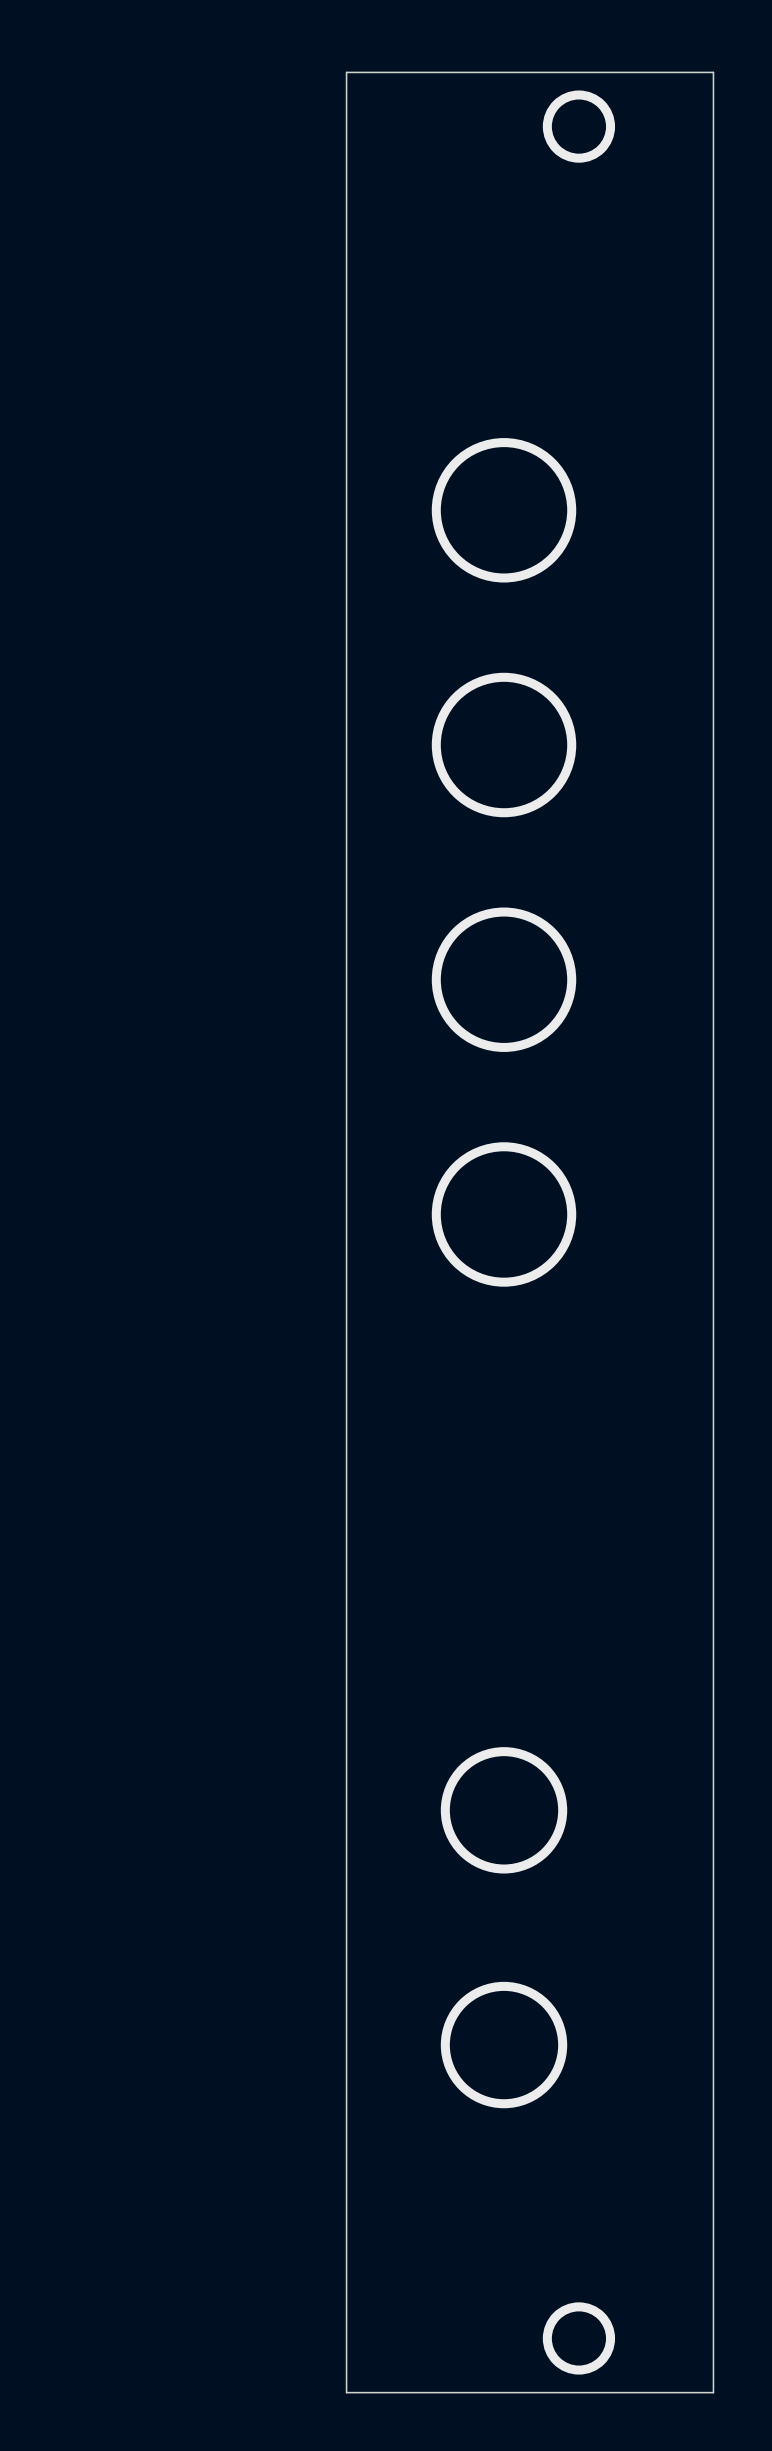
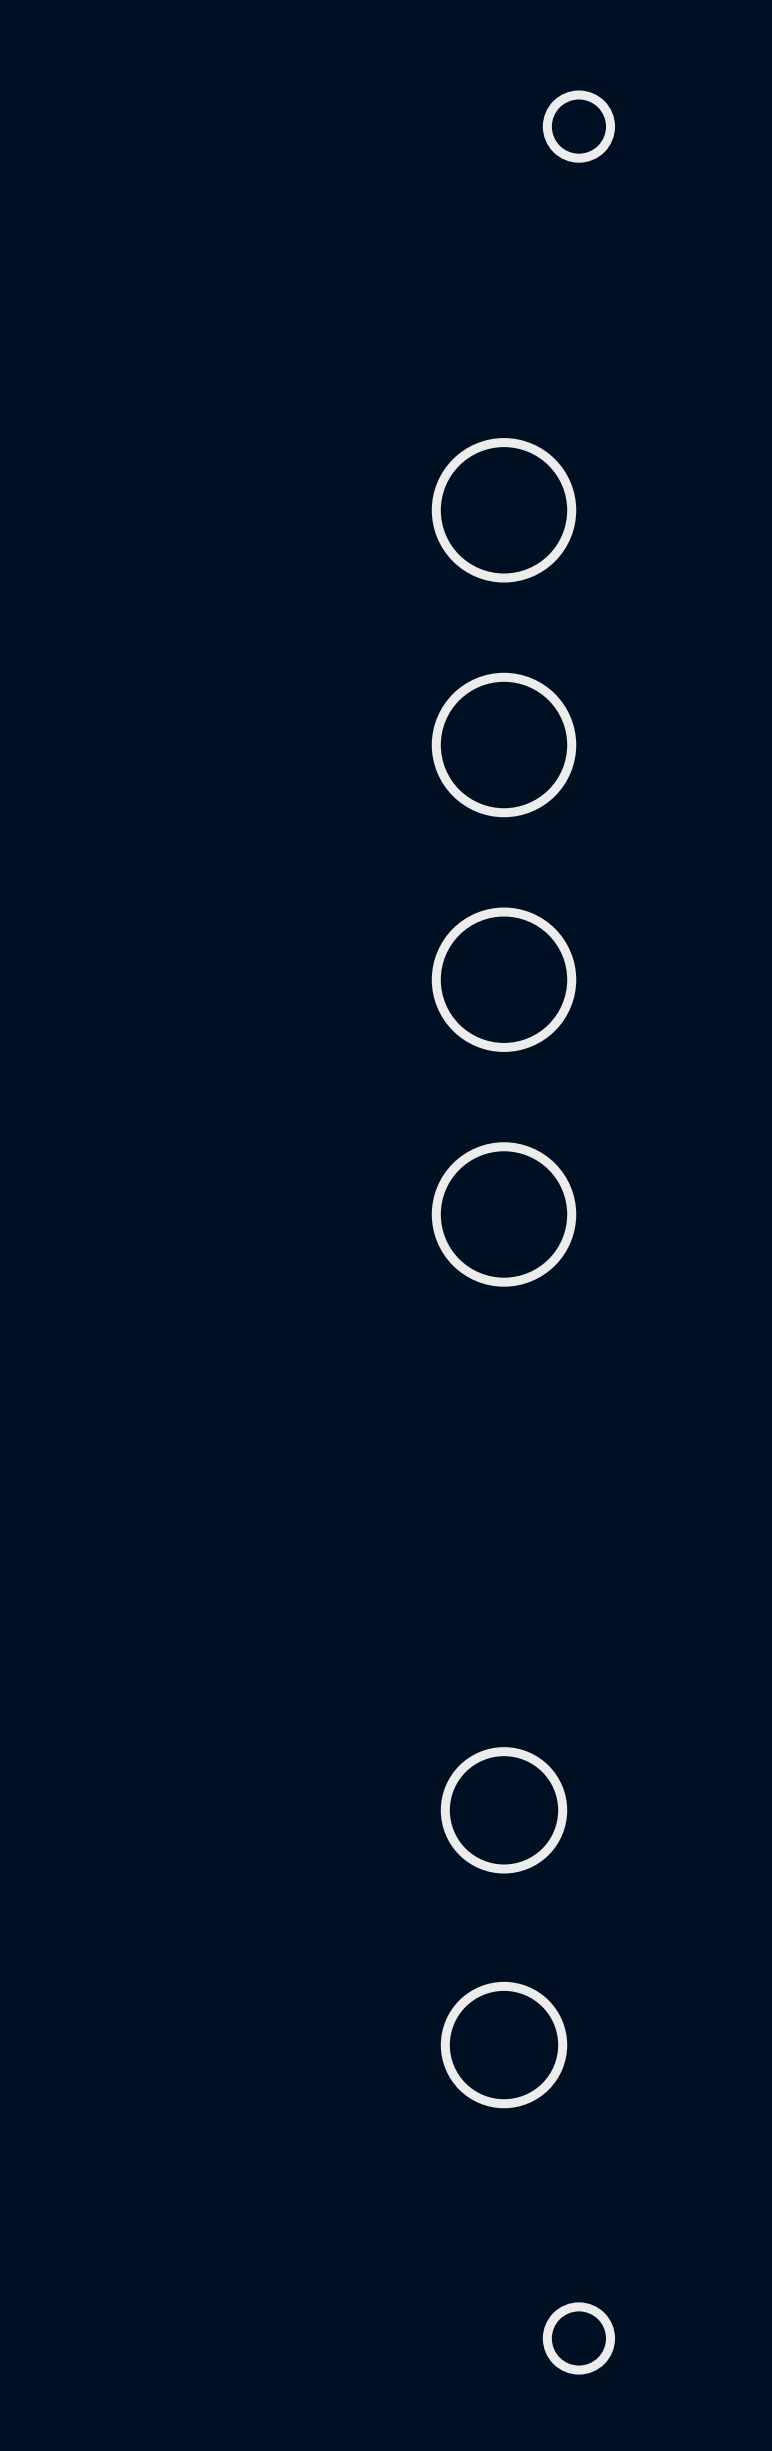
board edge: (713, 72) (346, 72) (346, 2392) (713, 2392) (713, 72) -> none

